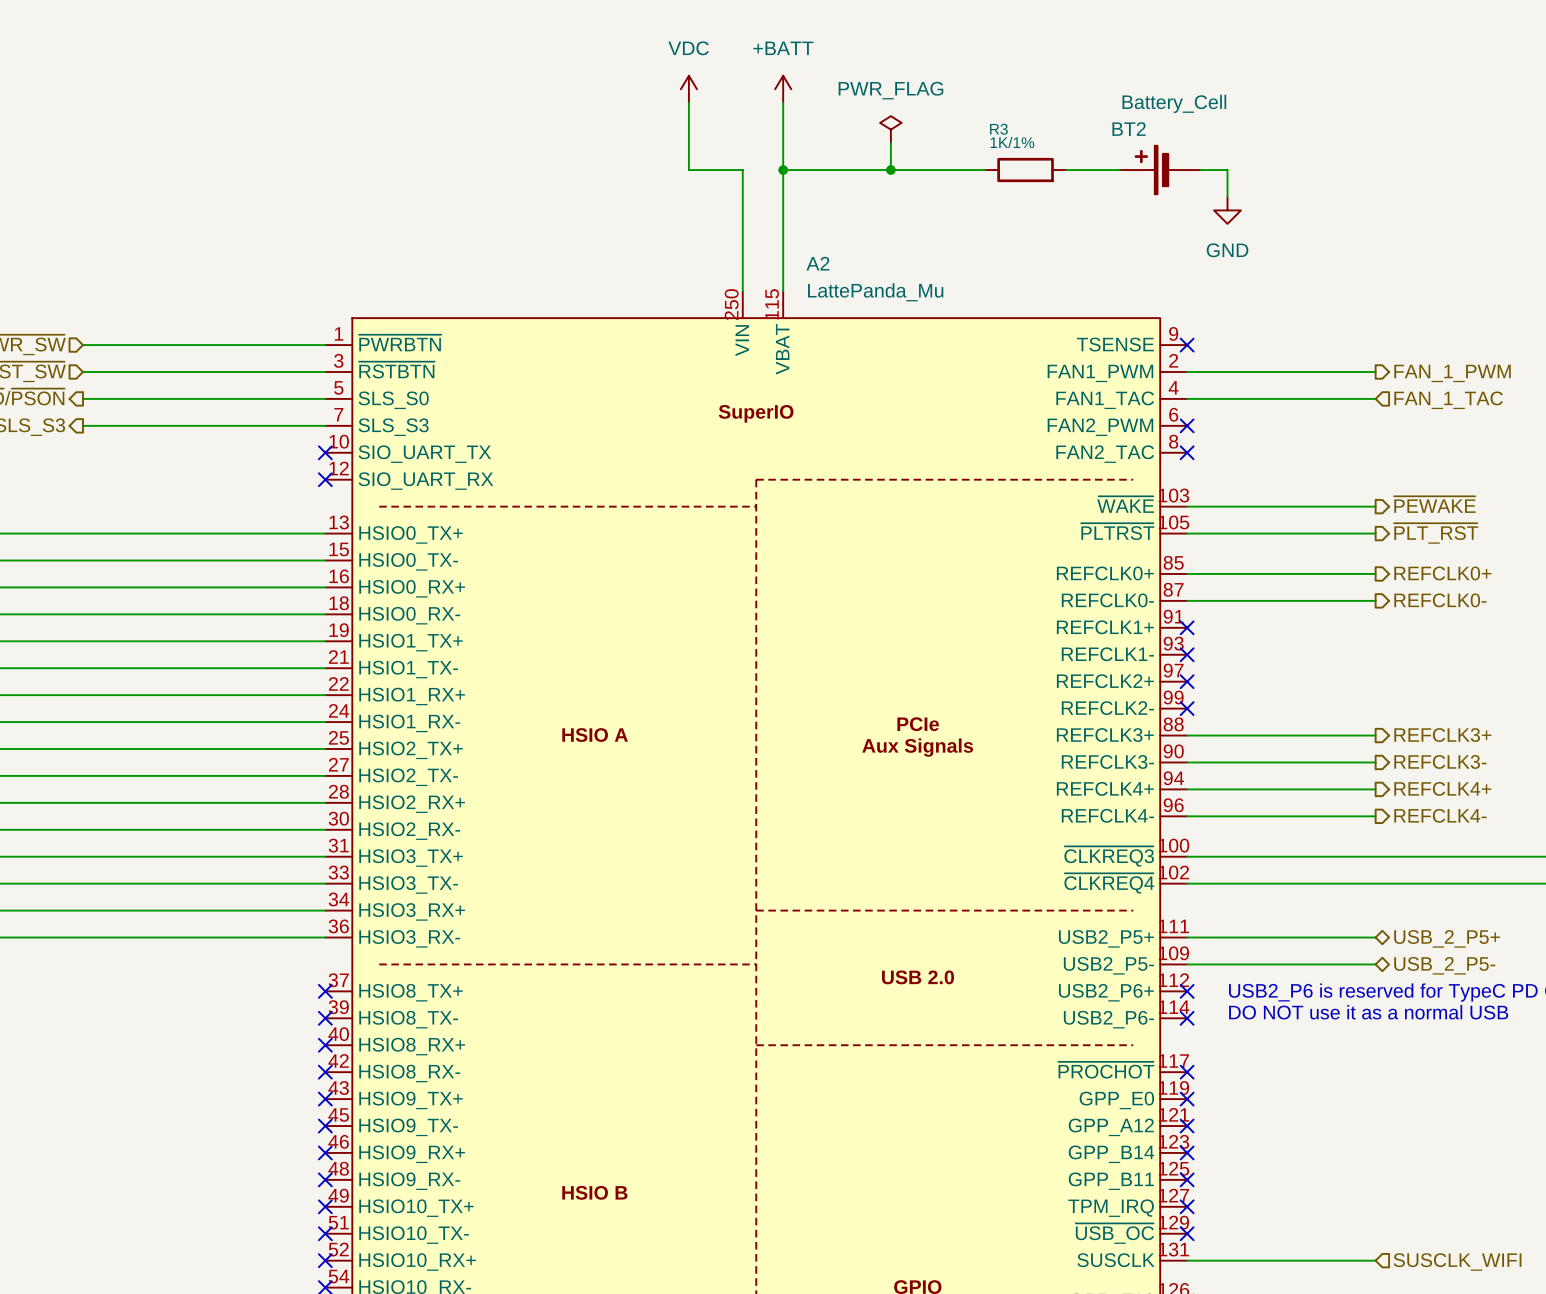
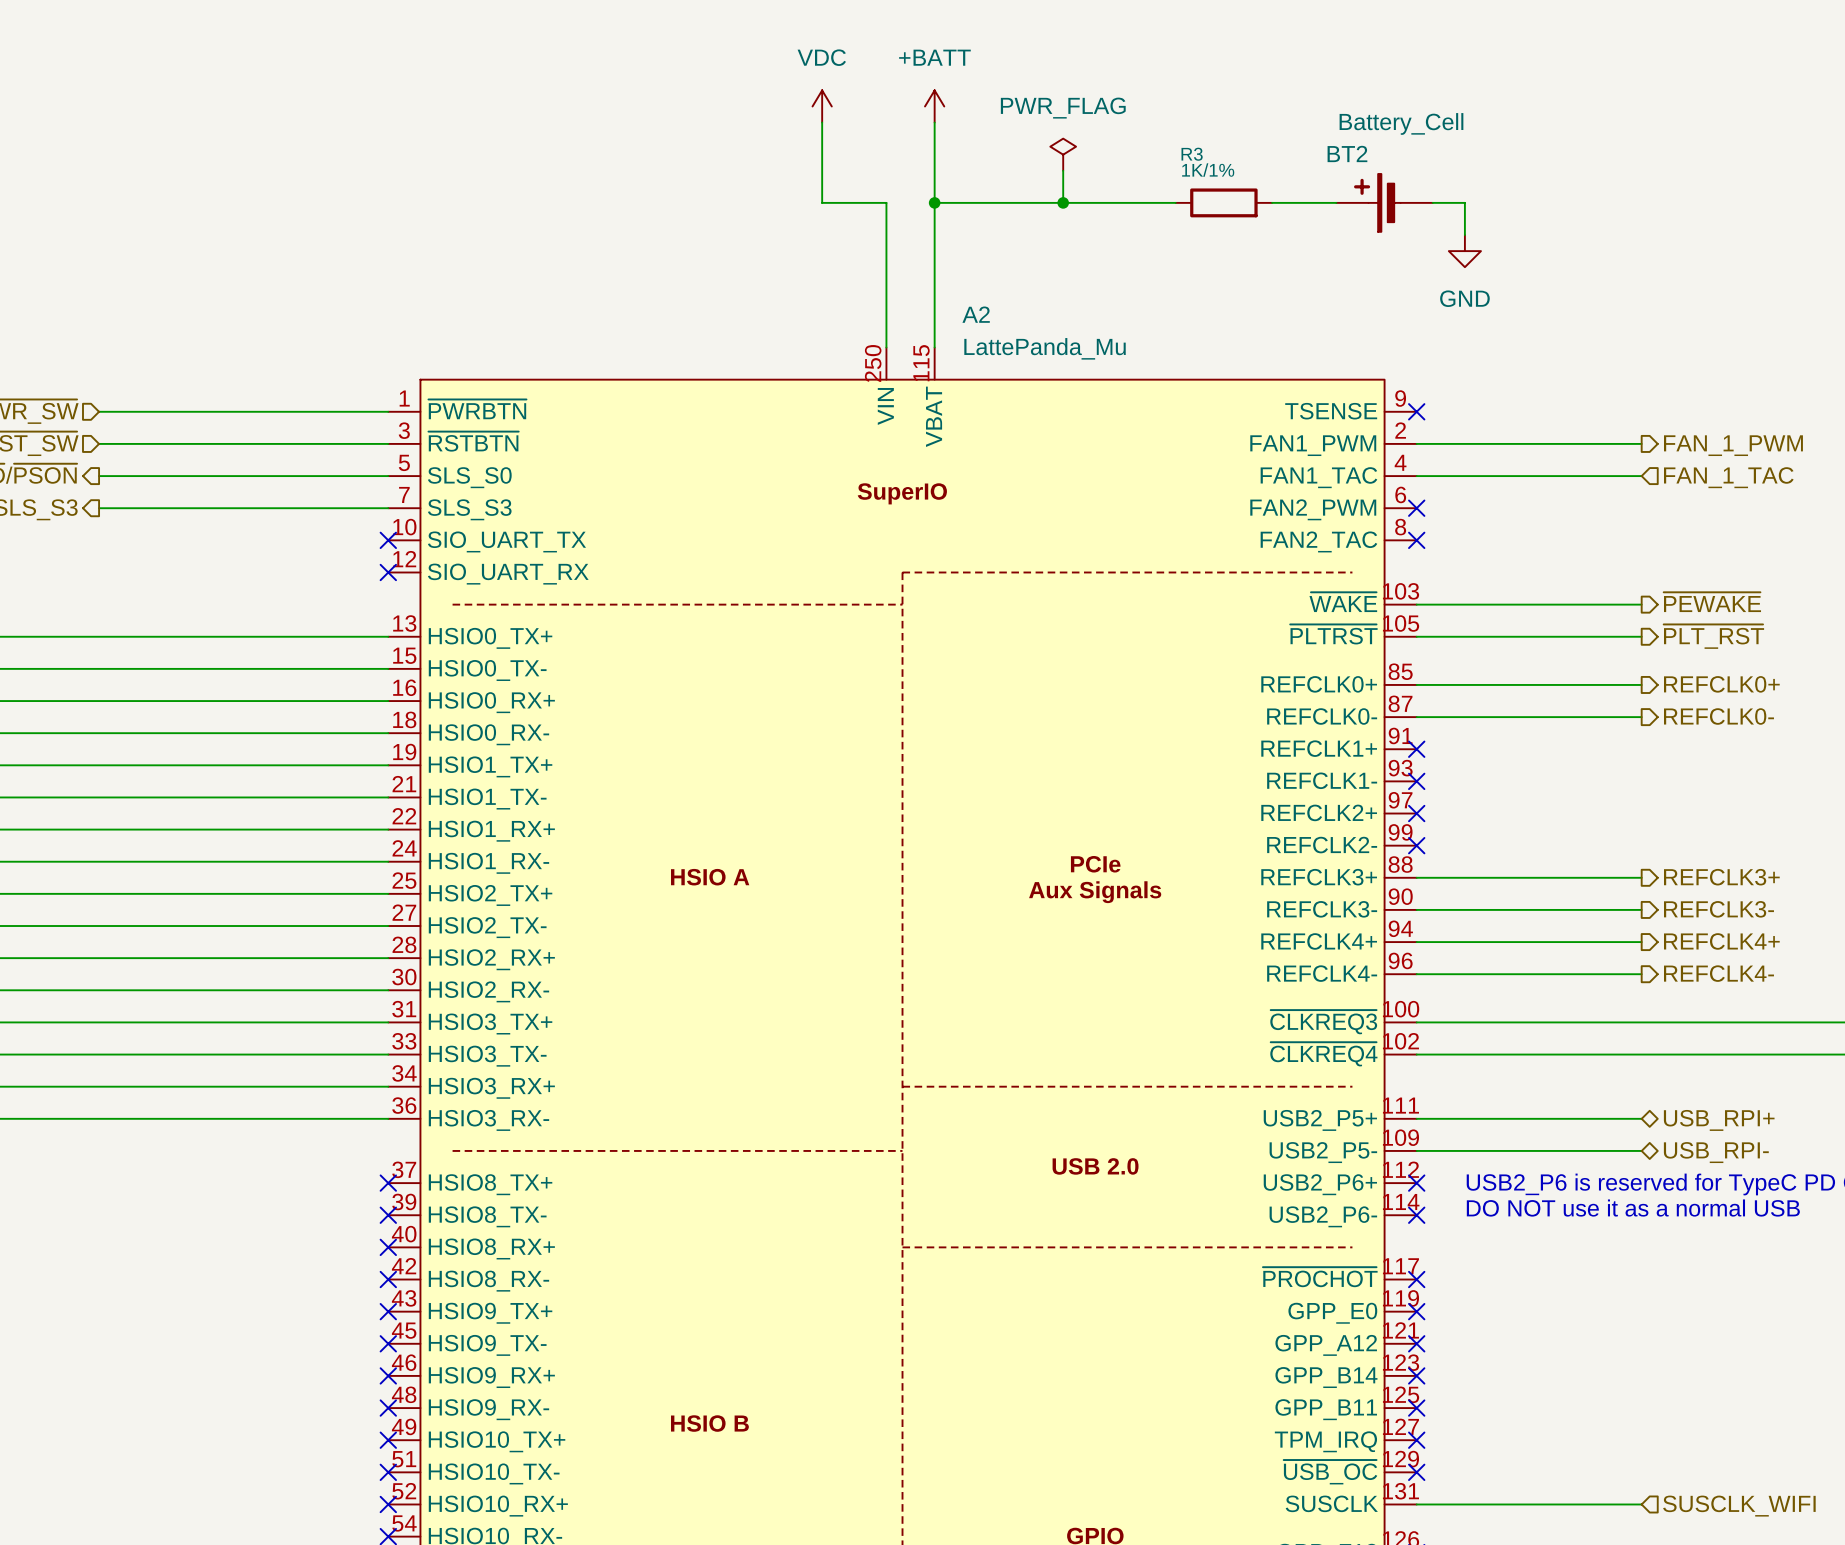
hierarchical label: USB_2_P5+ (1447, 938) -> USB_RPI+ (1719, 1120)
hierarchical label: USB_2_P5- (1444, 965) -> USB_RPI- (1716, 1152)

